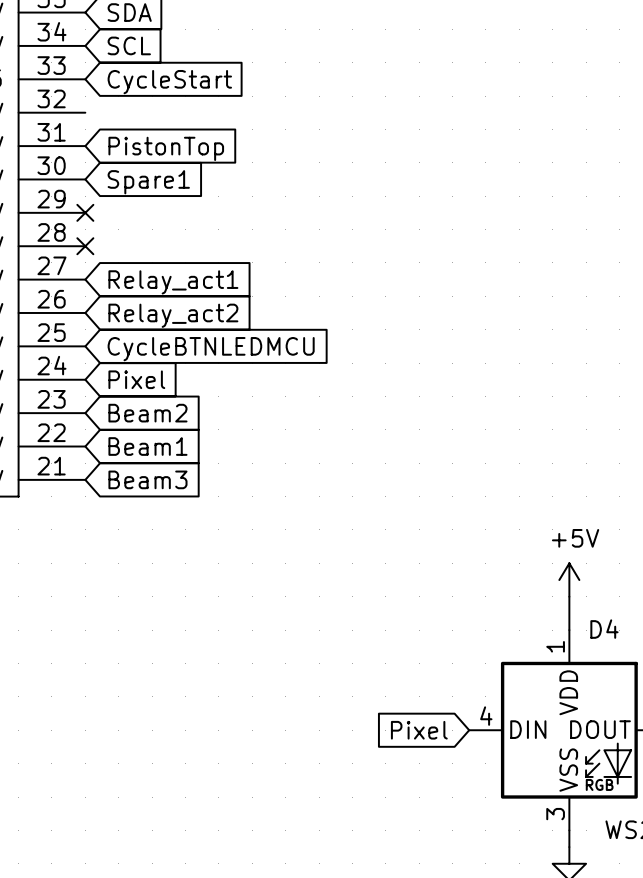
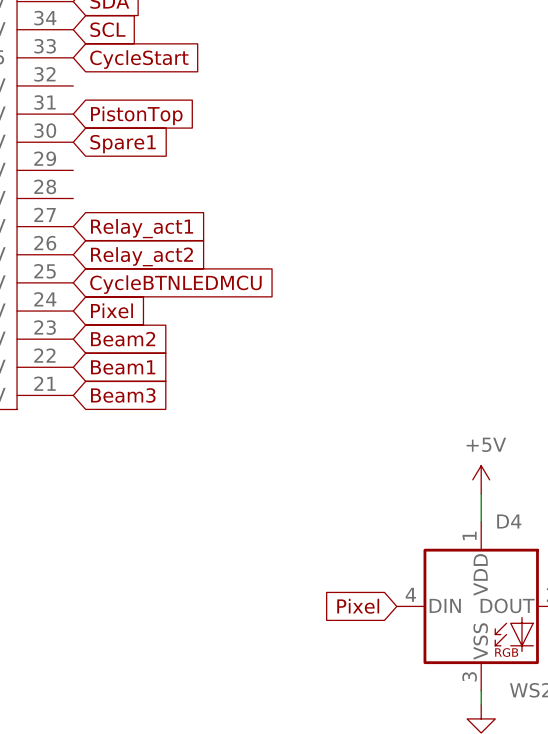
no-connect mark: (85, 212) -> none
no-connect mark: (85, 246) -> none

